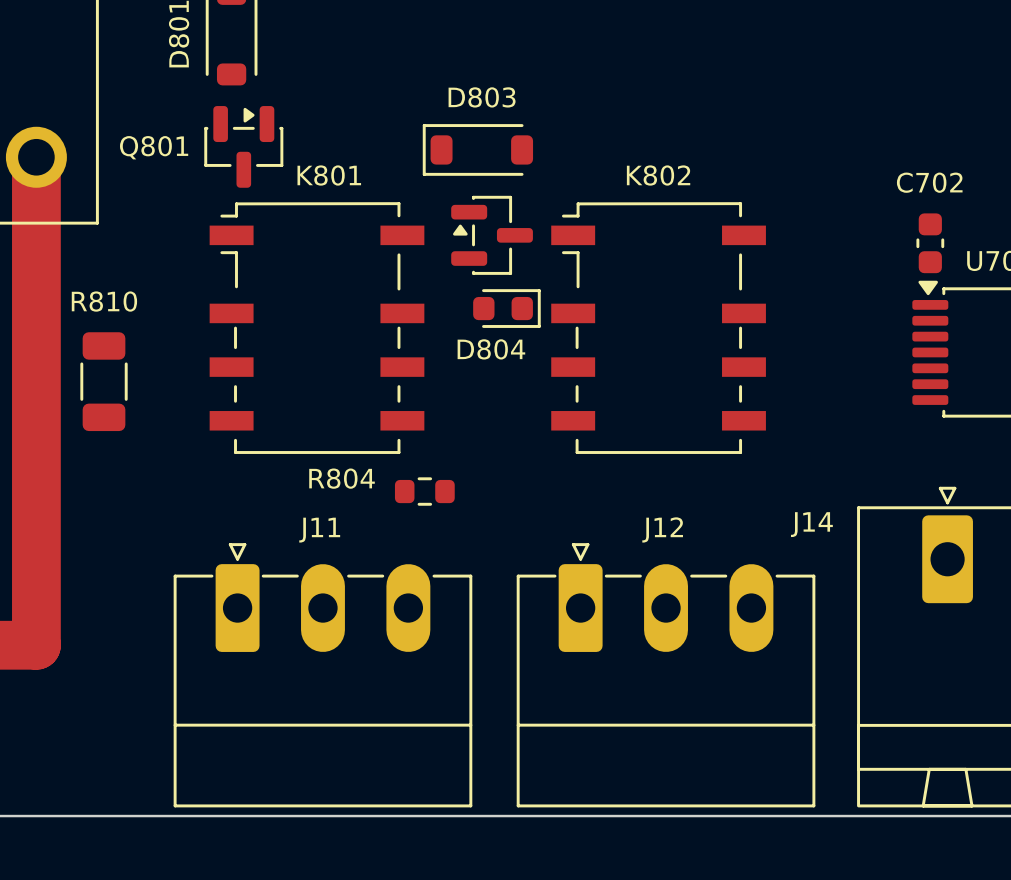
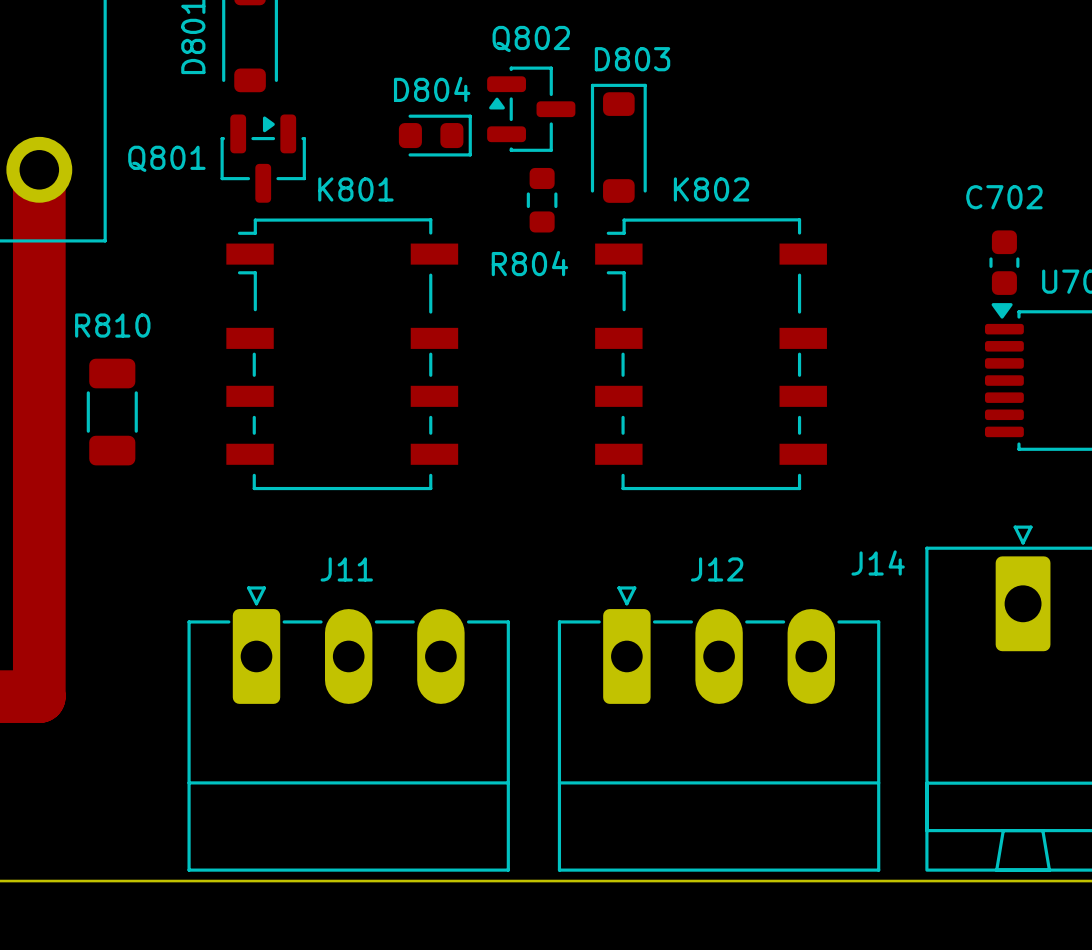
Q802: none -> (531, 109)
D803 rotation: 0° (477, 149) -> 90° clockwise (618, 143)
D803 position: (477, 149) -> (618, 143)
part: (492, 235) -> none
D804 position: (506, 308) -> (435, 135)
D804 name position: D804 (491, 349) -> D804 (432, 89)
R804 name position: R804 (342, 478) -> R804 (529, 263)
R804 rotation: 0° (424, 491) -> 90° clockwise (542, 200)
R804 position: (424, 491) -> (542, 200)

